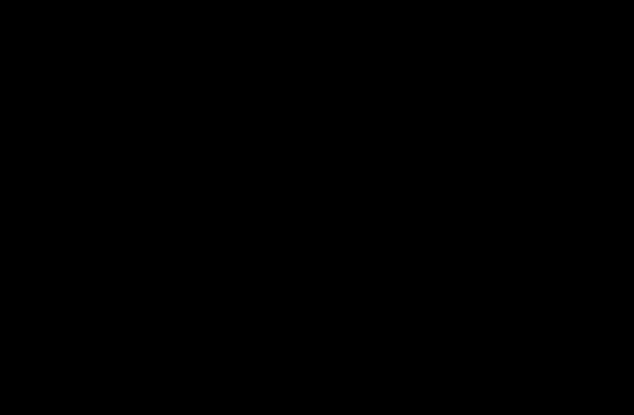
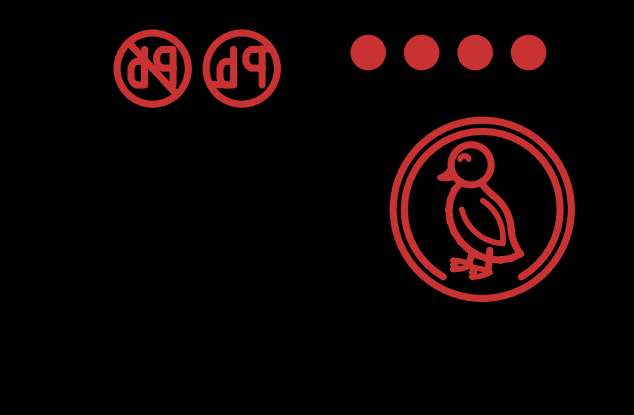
drawing: none -> [113, 29, 281, 108]
drawing: none -> [350, 34, 547, 71]
drawing: none -> [389, 116, 575, 302]

